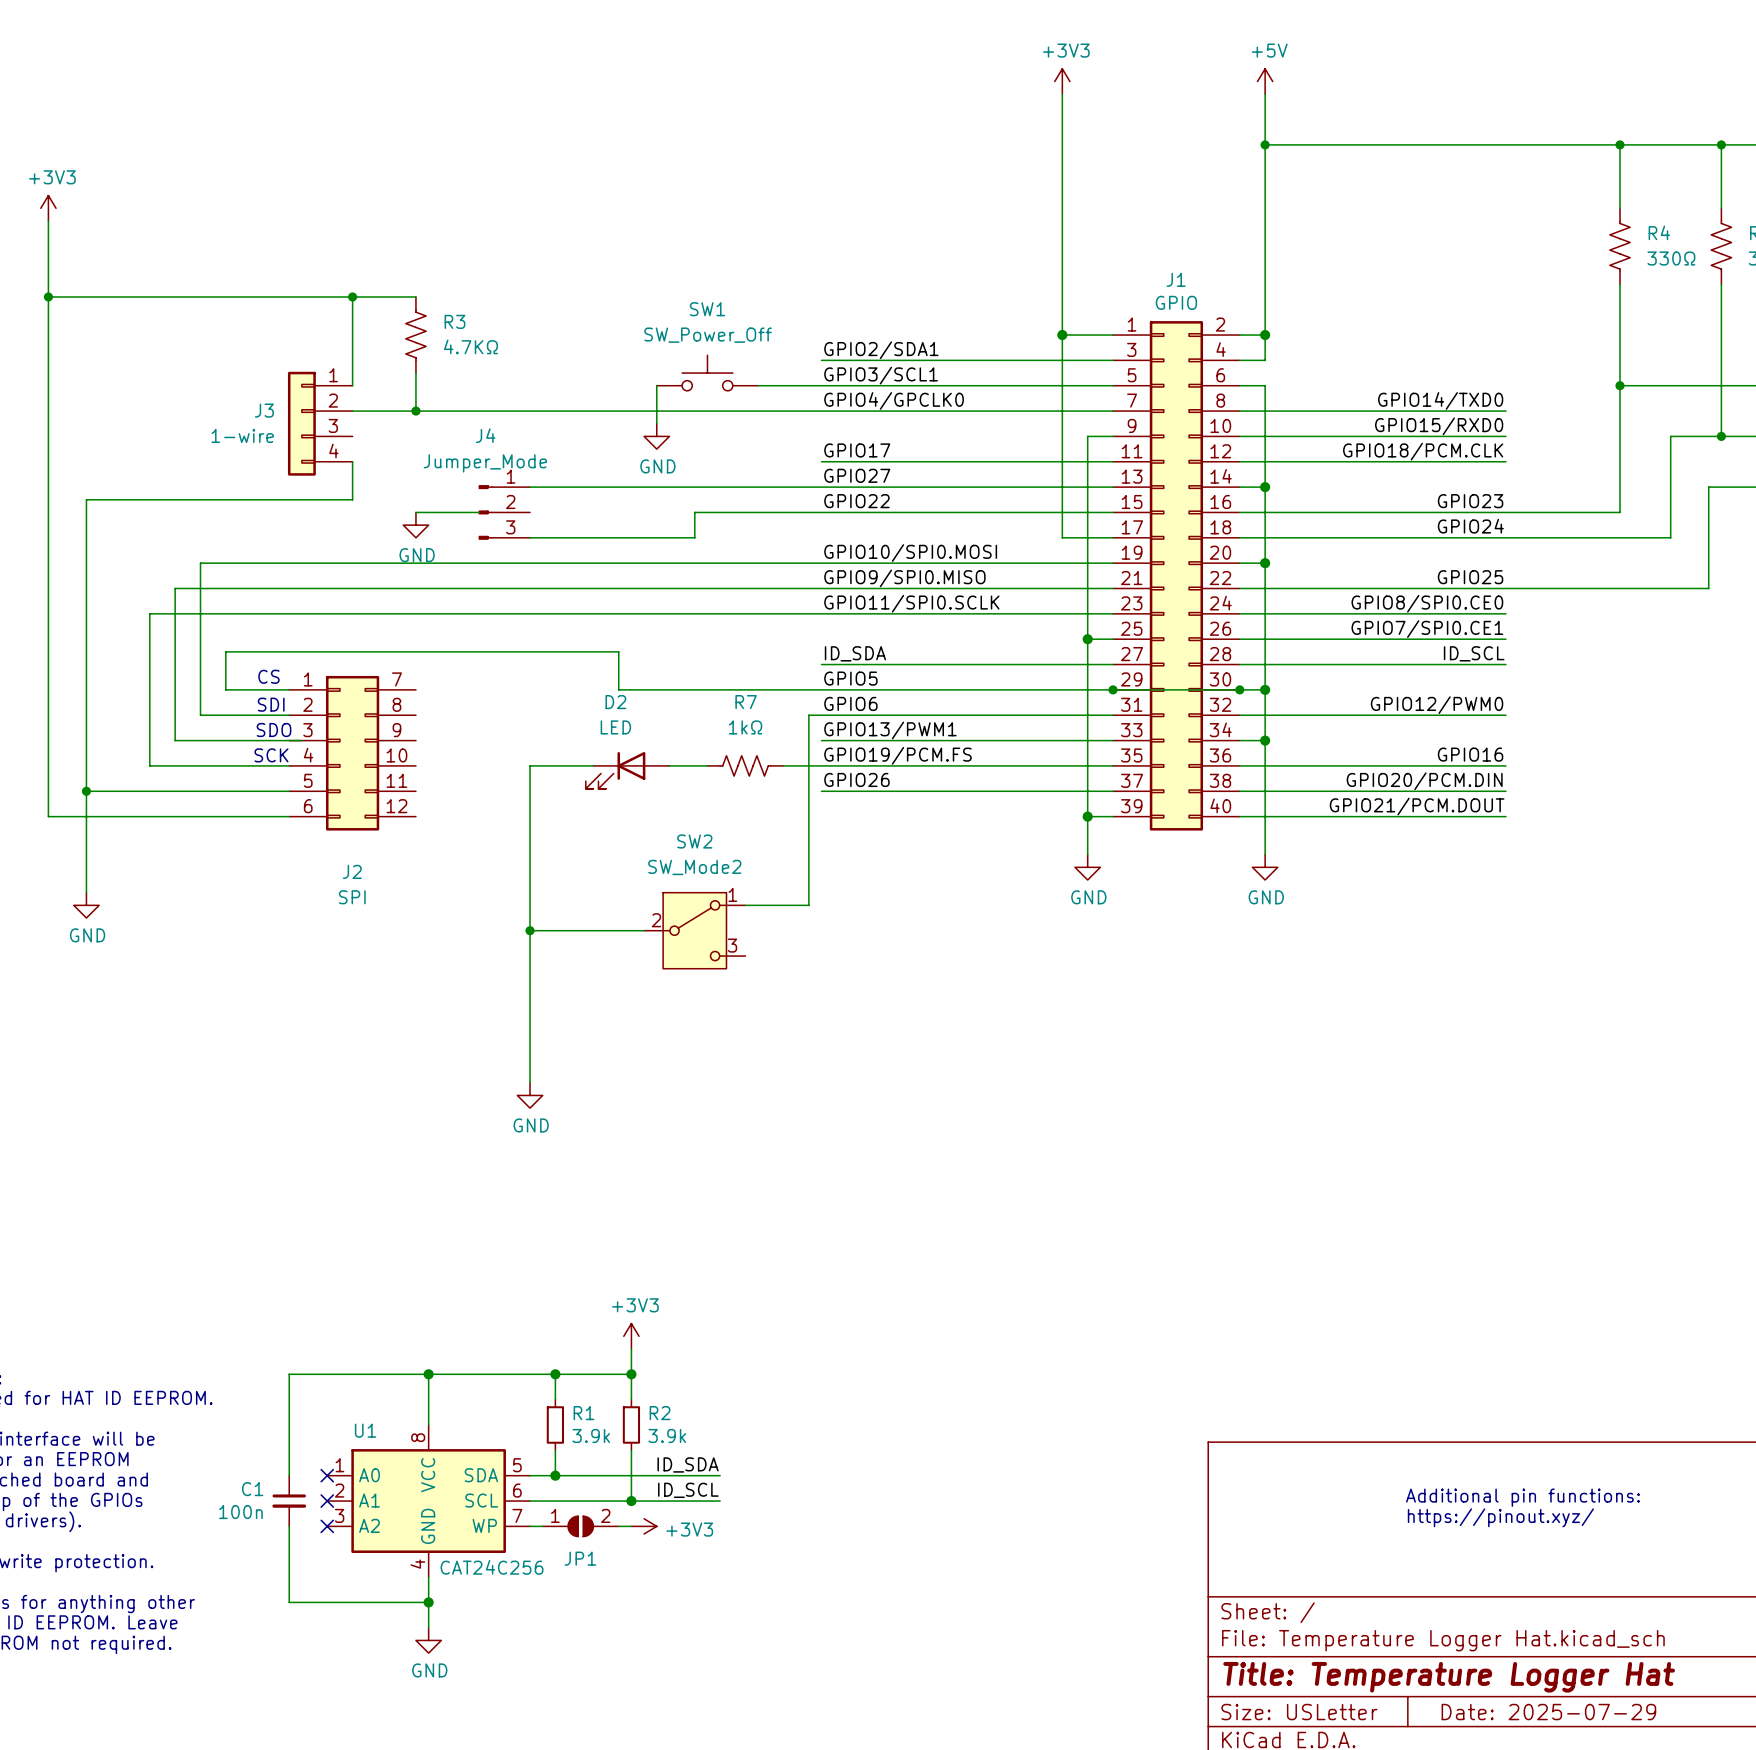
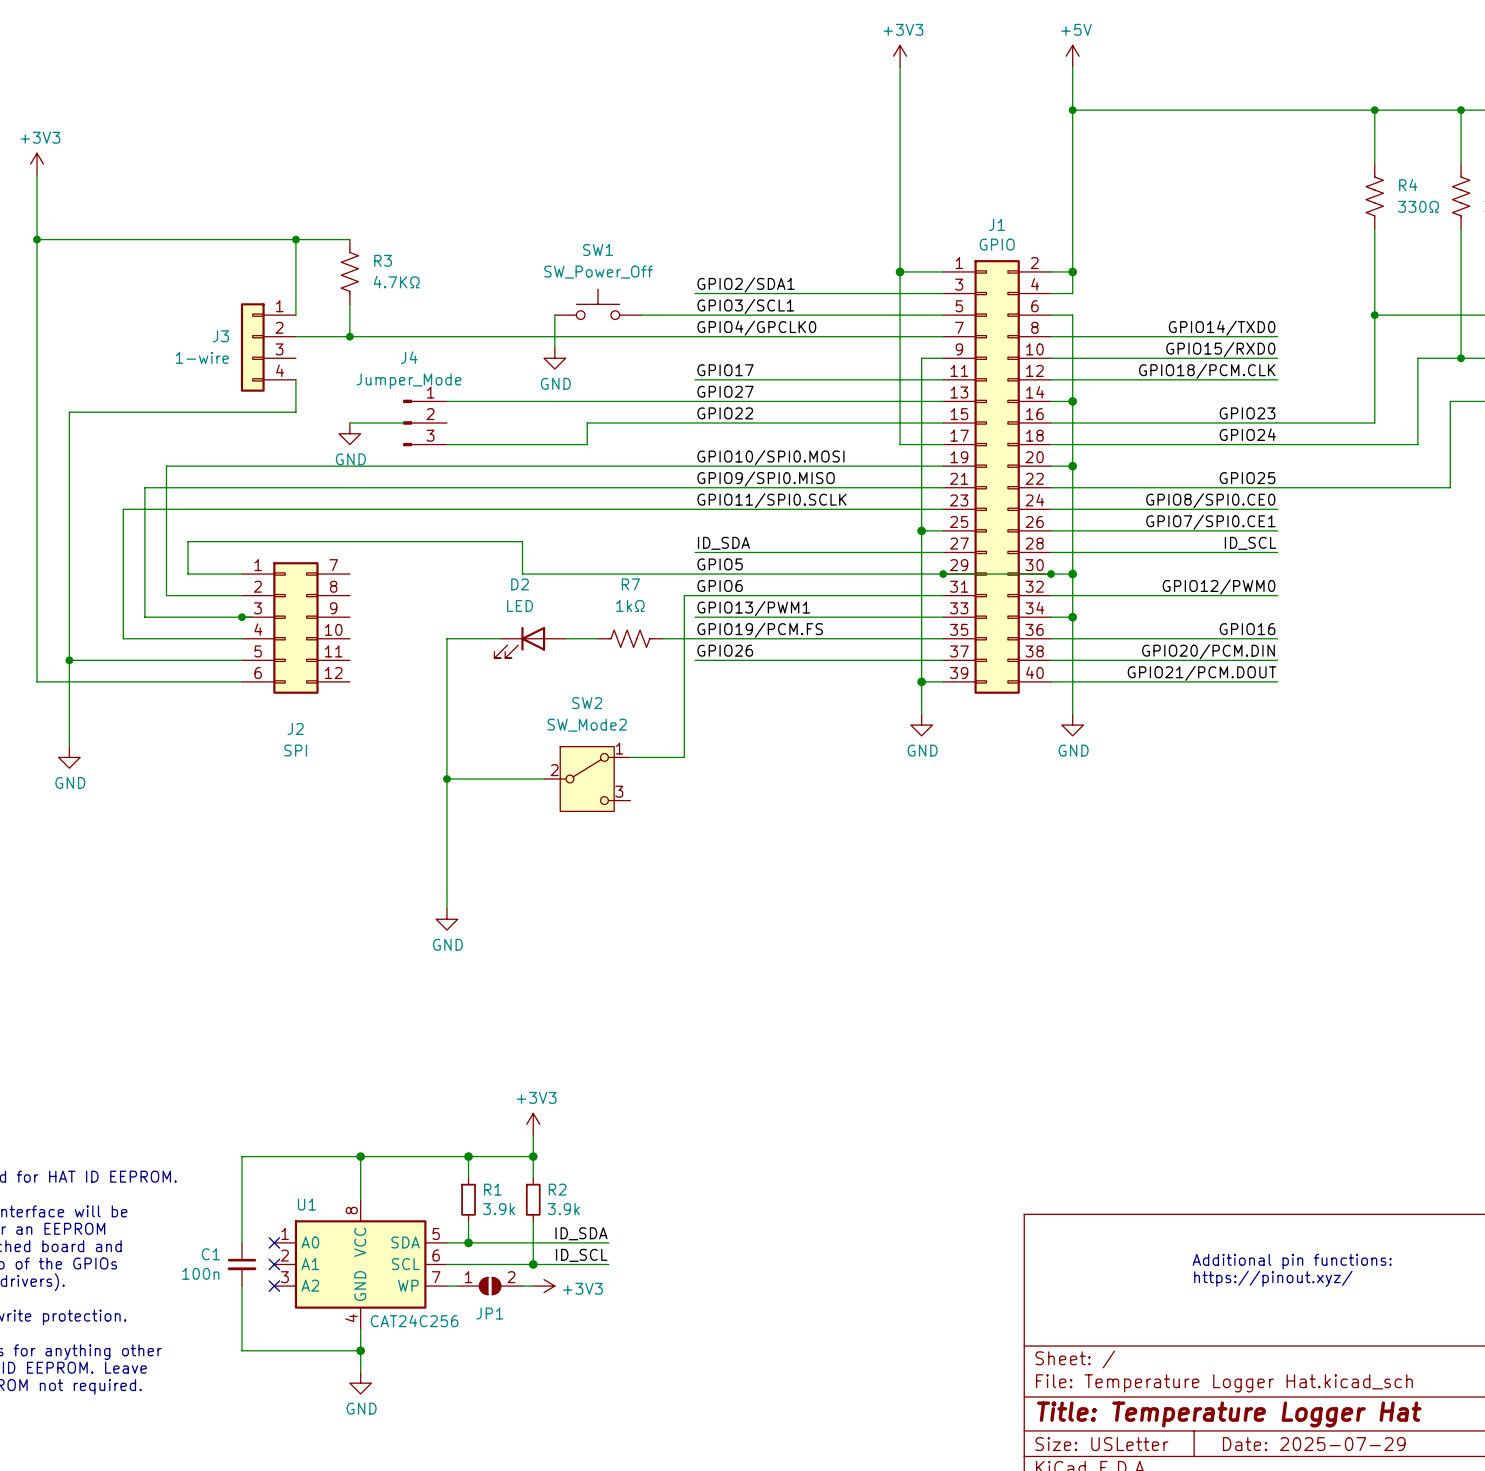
text: CS (268, 676) -> none
text: SDI (271, 704) -> none
text: SDO (274, 730) -> none
junction: none -> (241, 617)
text: SCK (271, 755) -> none

